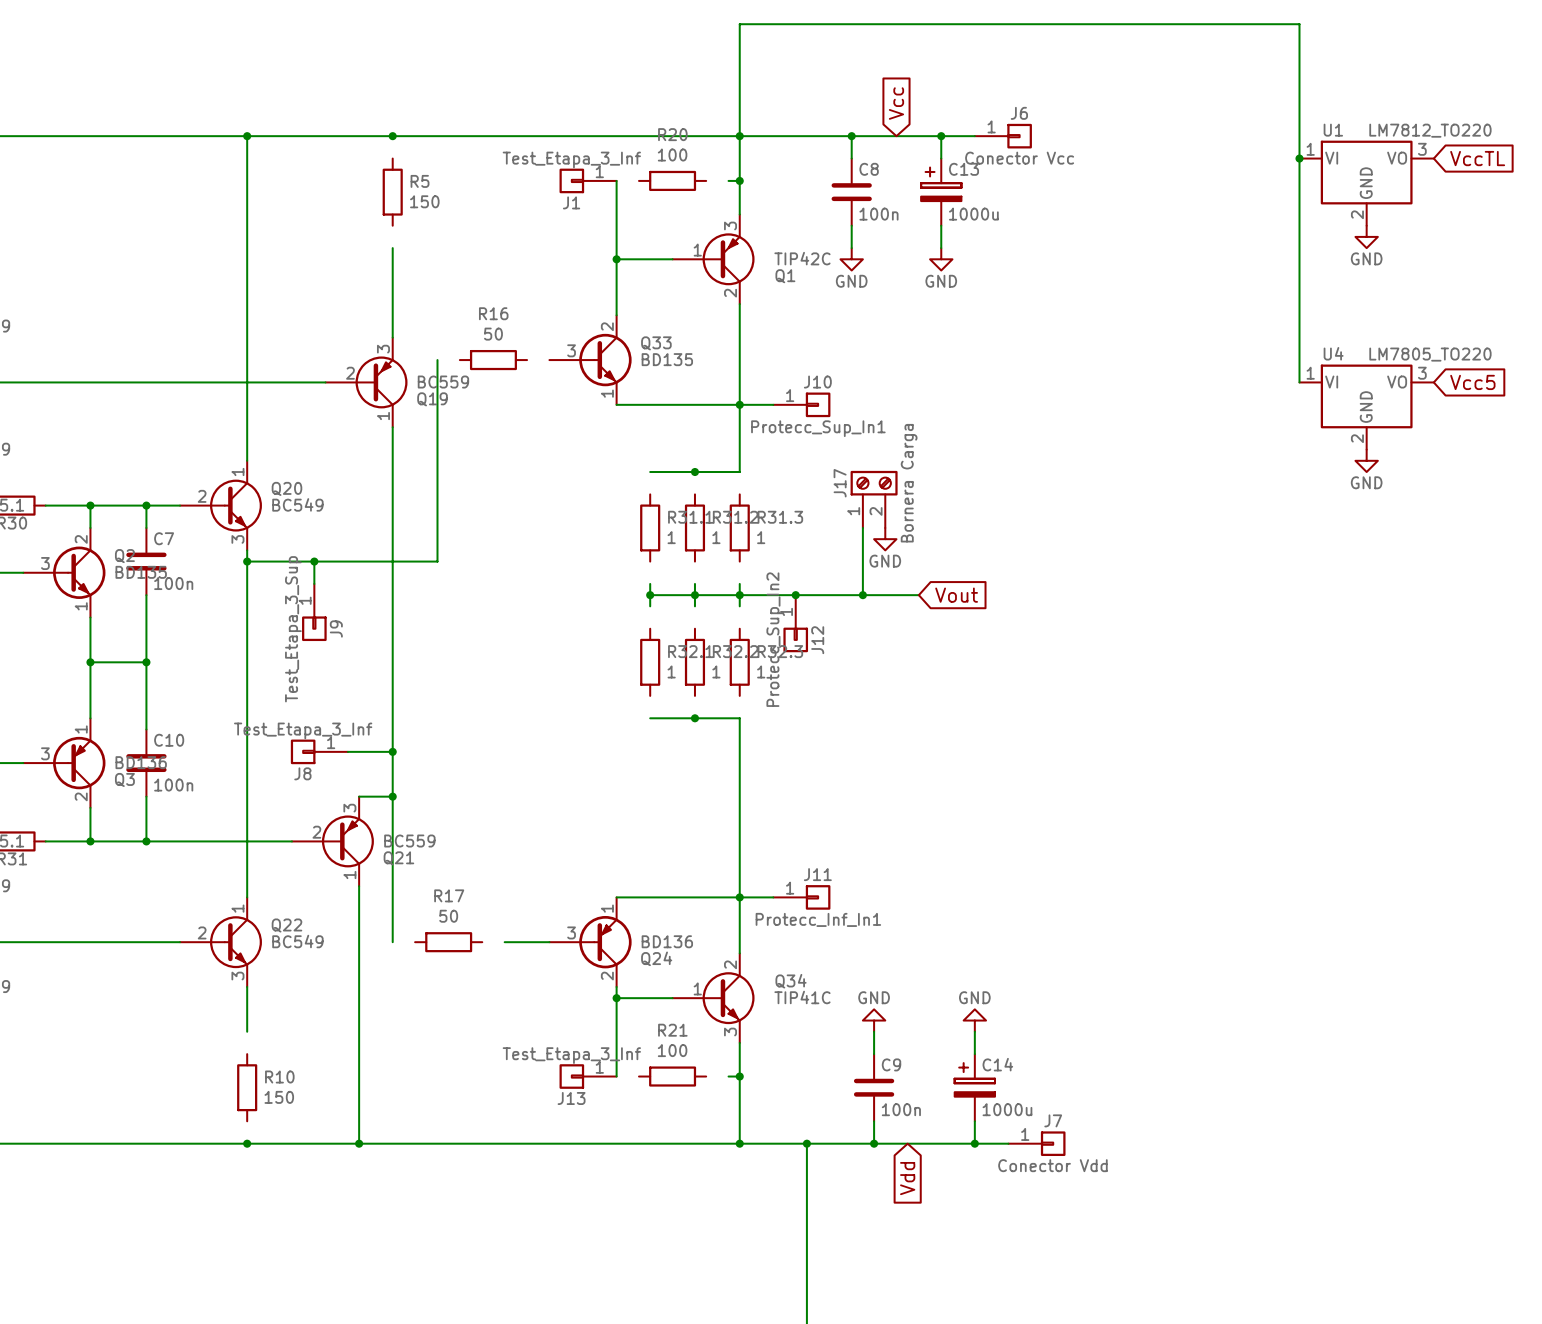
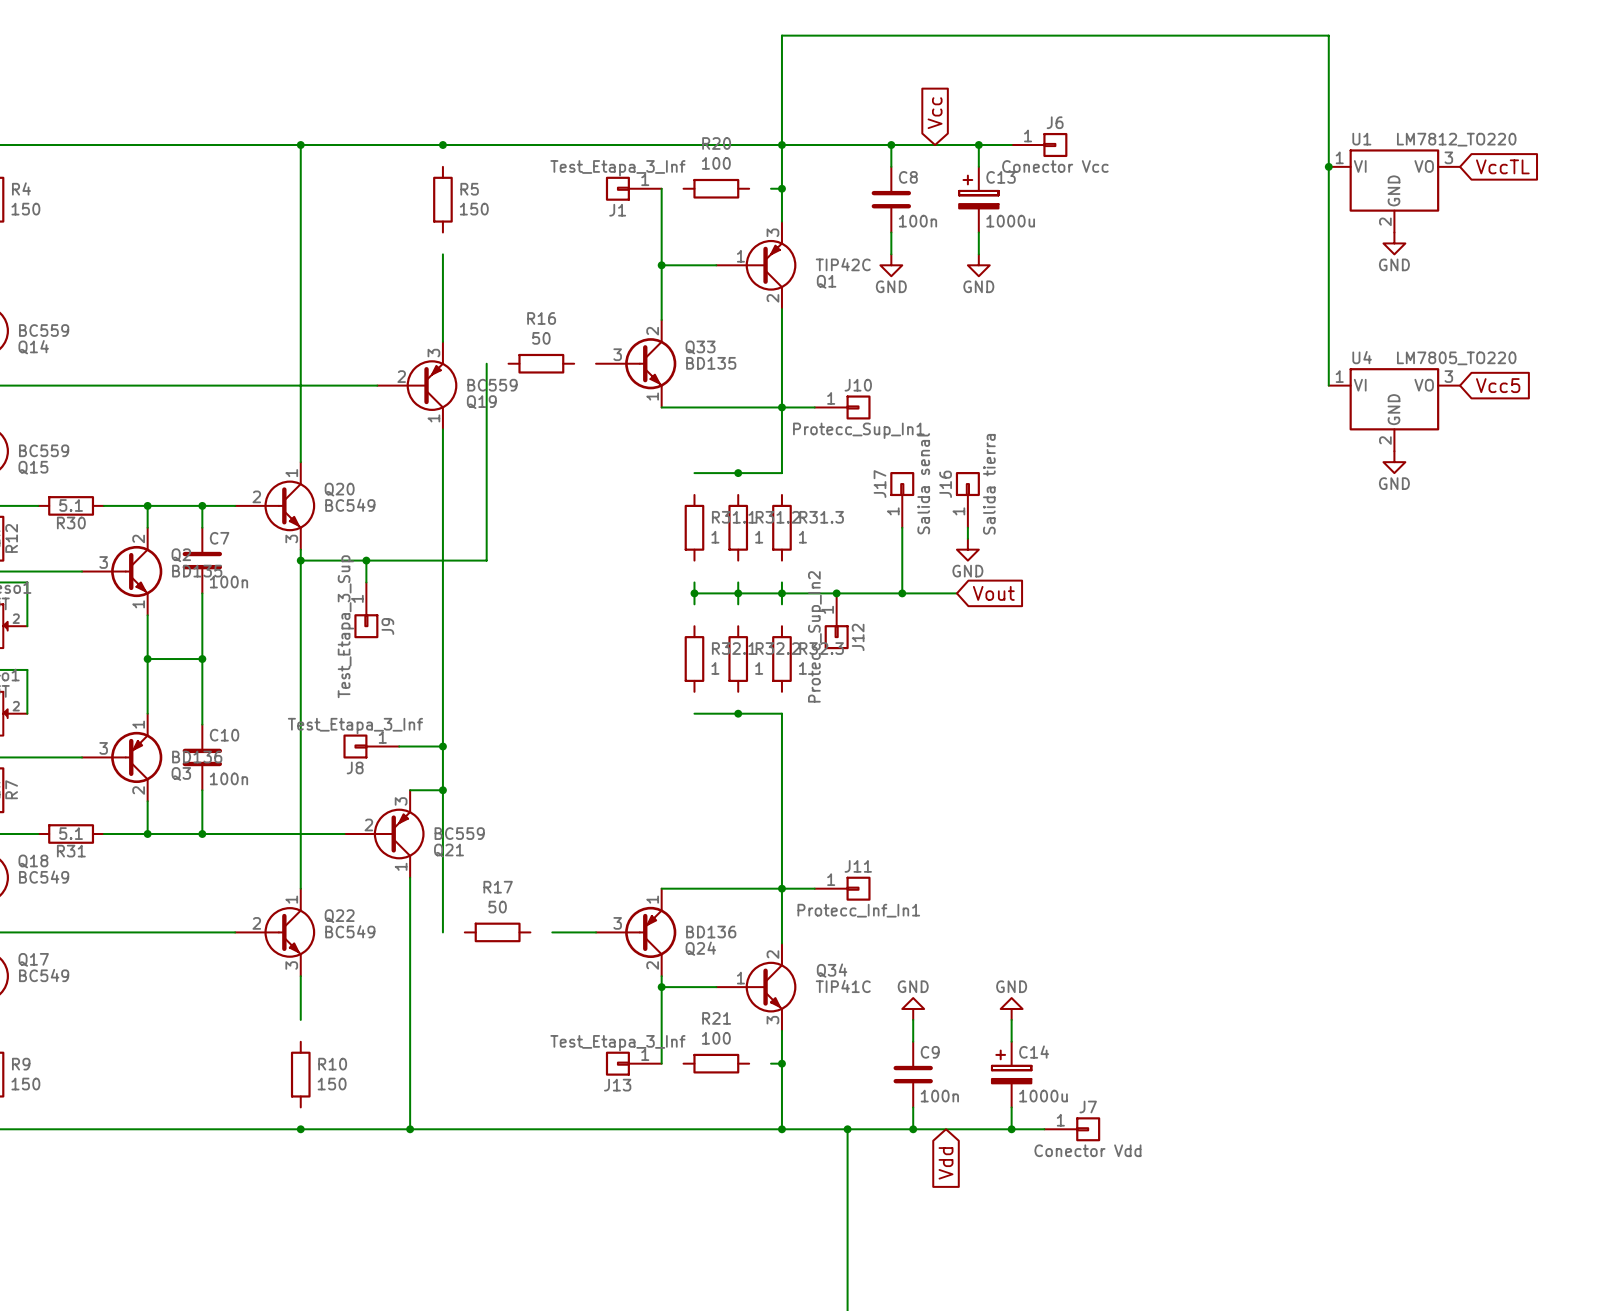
J17 symbol: [850, 470, 898, 528] -> [890, 472, 915, 528]
J17 value: Bornera Carga (909, 483) -> Salida senal (923, 483)
J16: none -> Salida tierra (967, 499)
wire: none -> (967, 527) (967, 538)
power symbol position: GND (885, 539) -> GND (967, 549)

